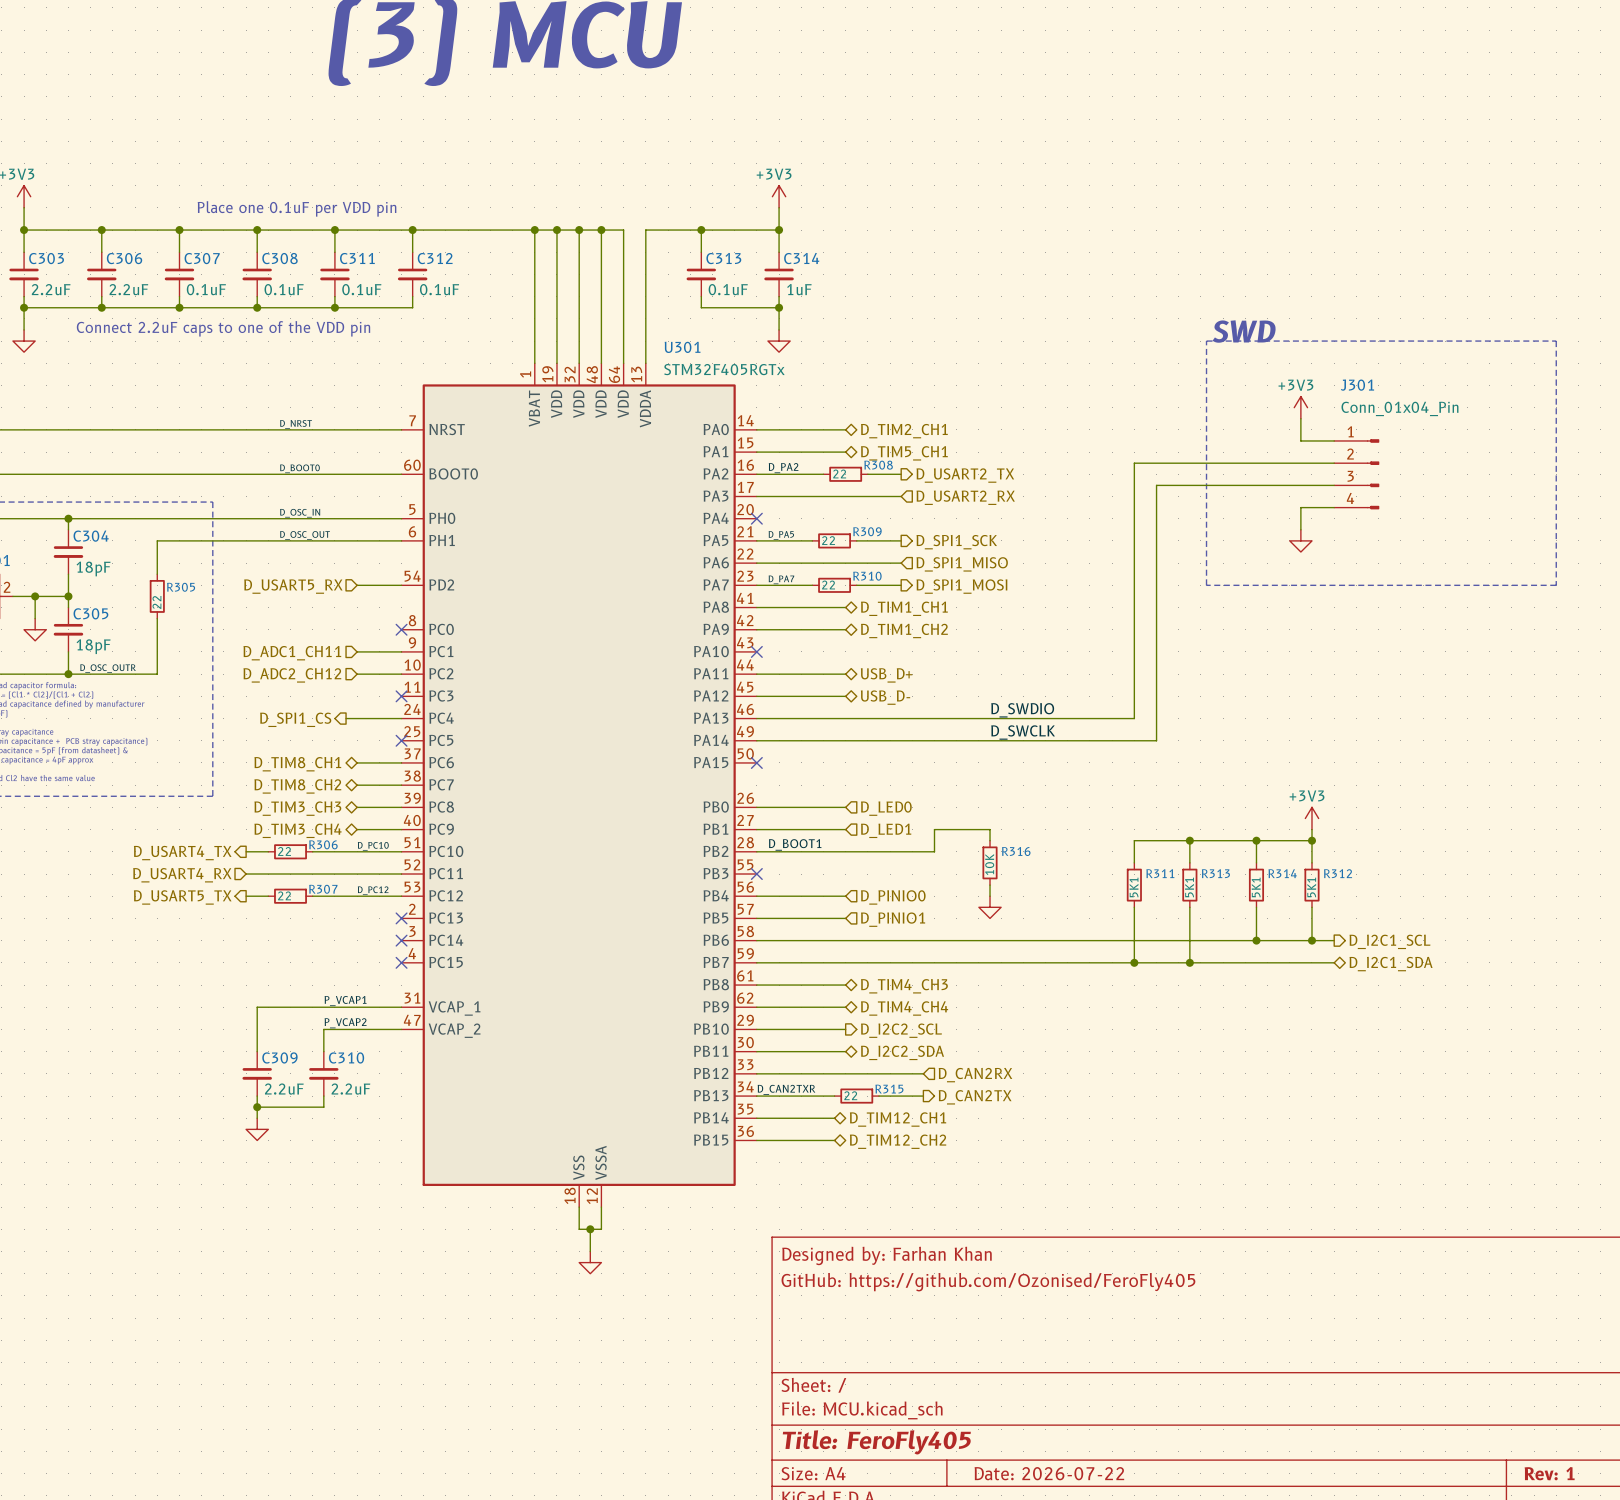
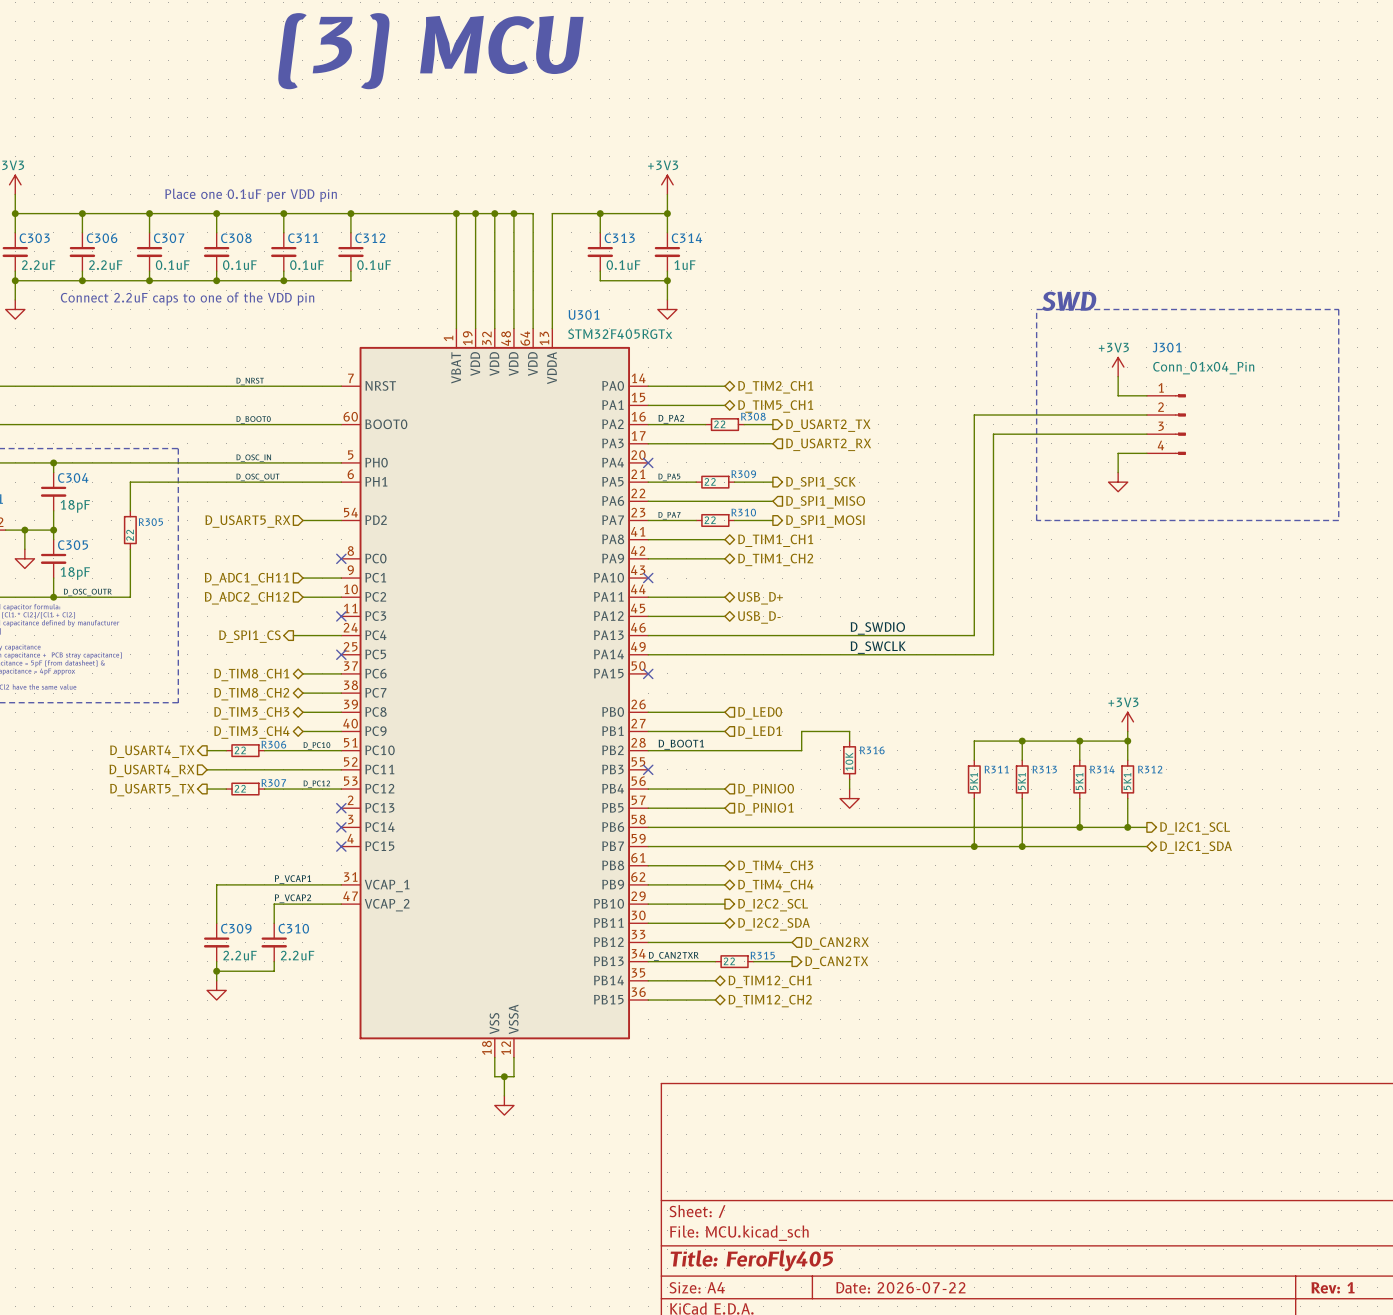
title block: Designed by: Farhan Khan (887, 1255) -> none
title block: GitHub: https://github.com/Ozonised/FeroFly405 (988, 1282) -> none

